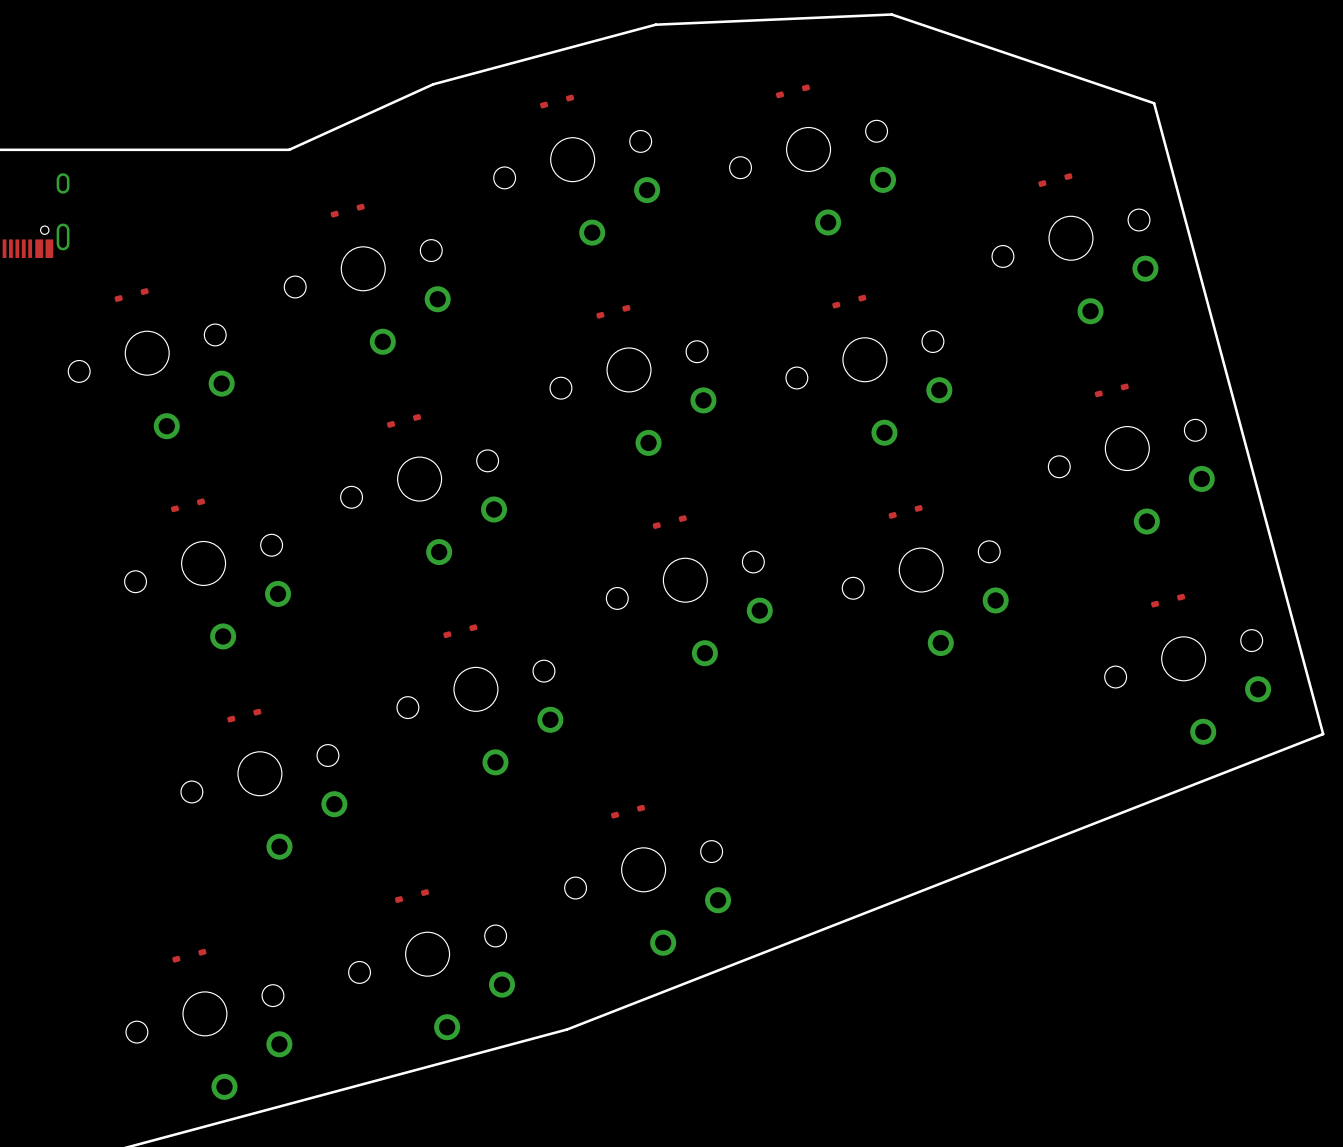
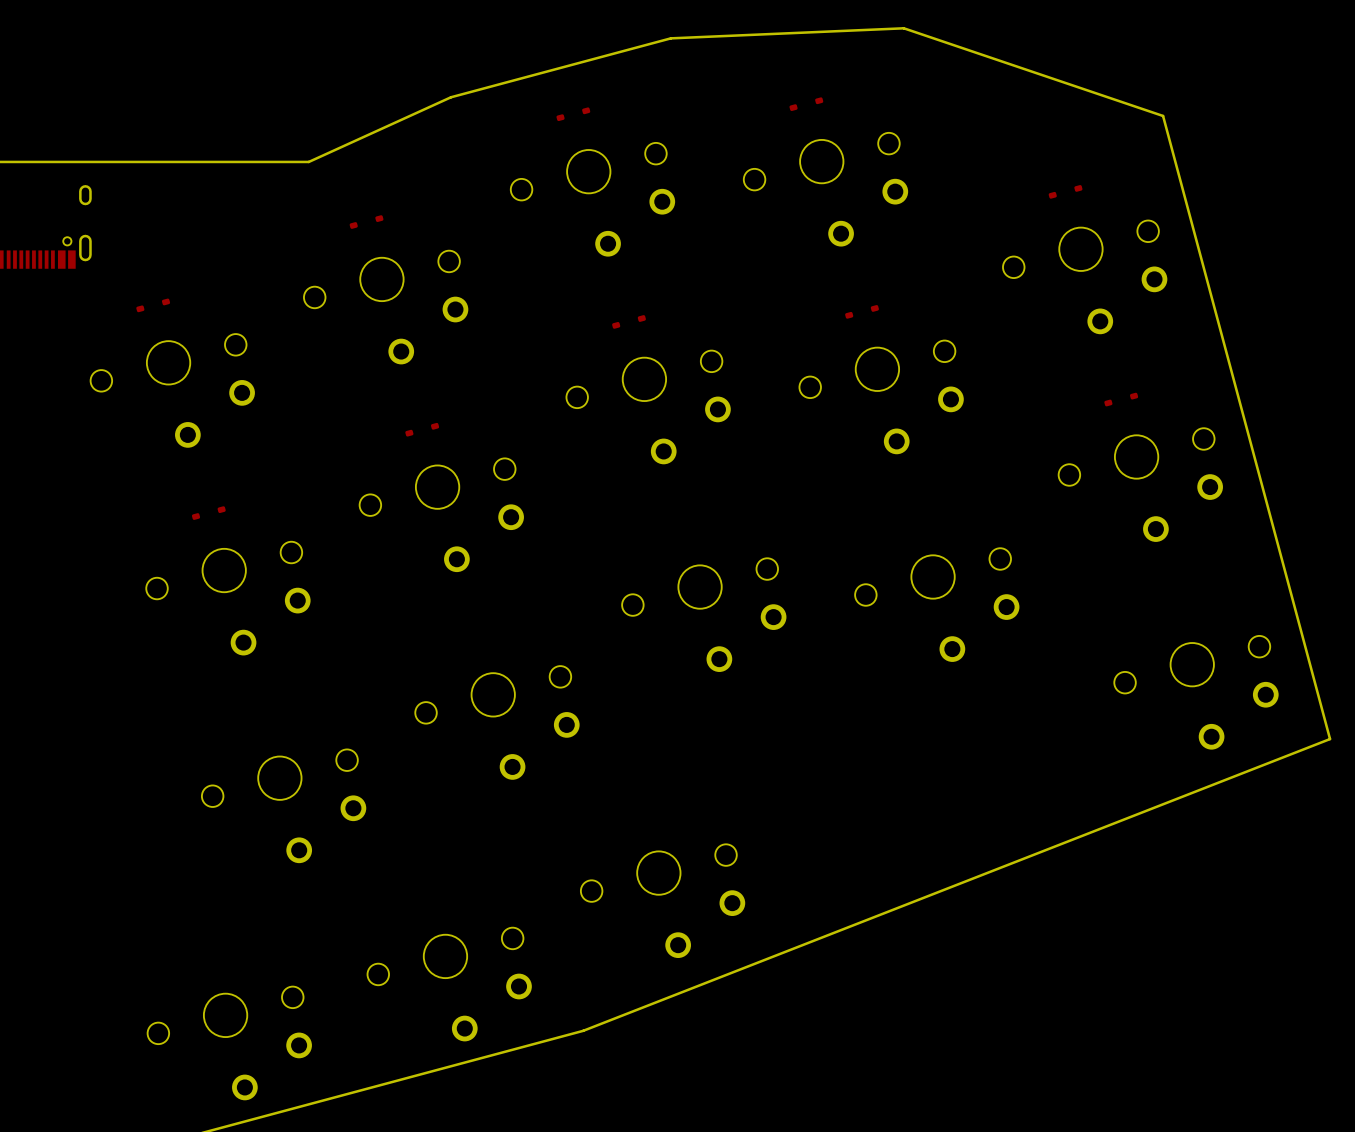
part: (905, 511) -> none
part: (669, 522) -> none
part: (1168, 600) -> none
part: (460, 631) -> none
part: (244, 715) -> none
part: (628, 811) -> none
part: (412, 896) -> none
part: (189, 955) -> none

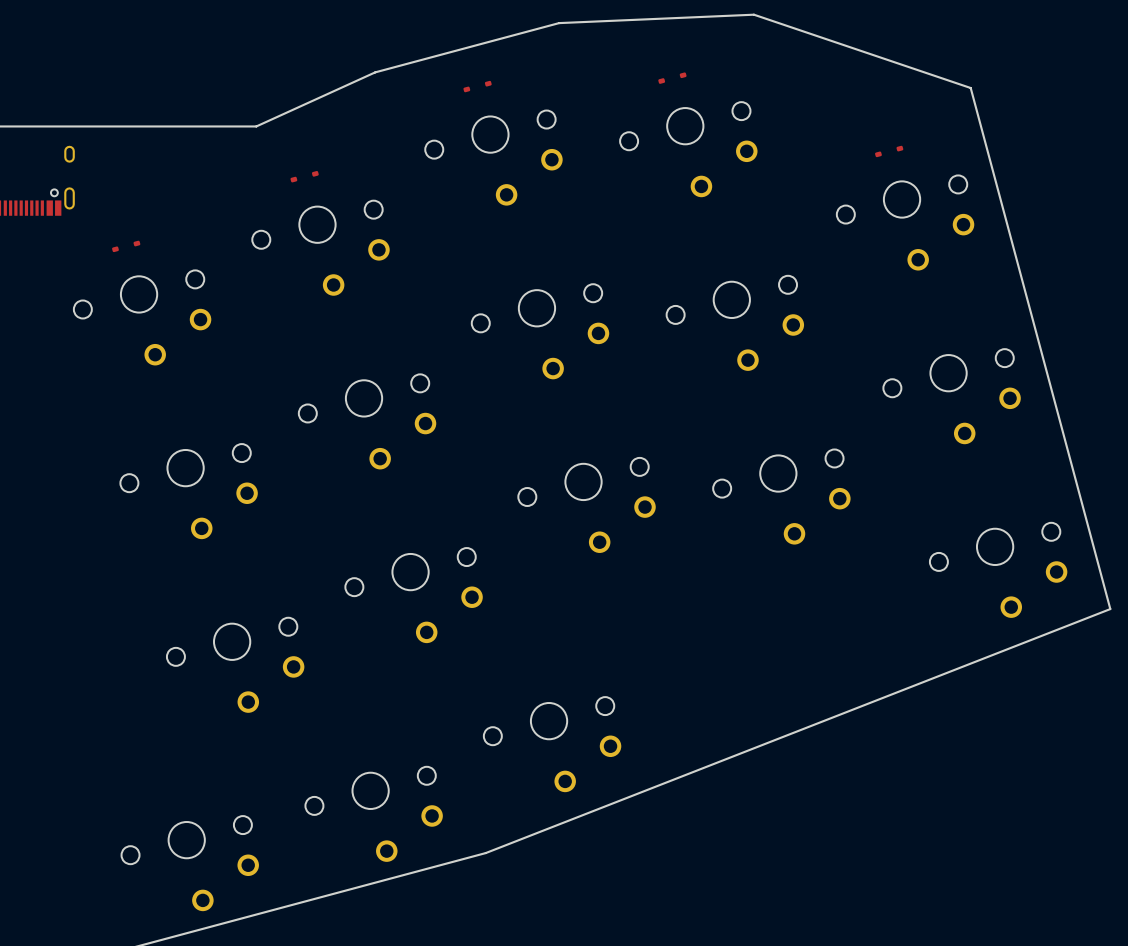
part: (862, 311) -> none
part: (629, 321) -> none
part: (1121, 399) -> none
part: (422, 429) -> none
part: (208, 513) -> none

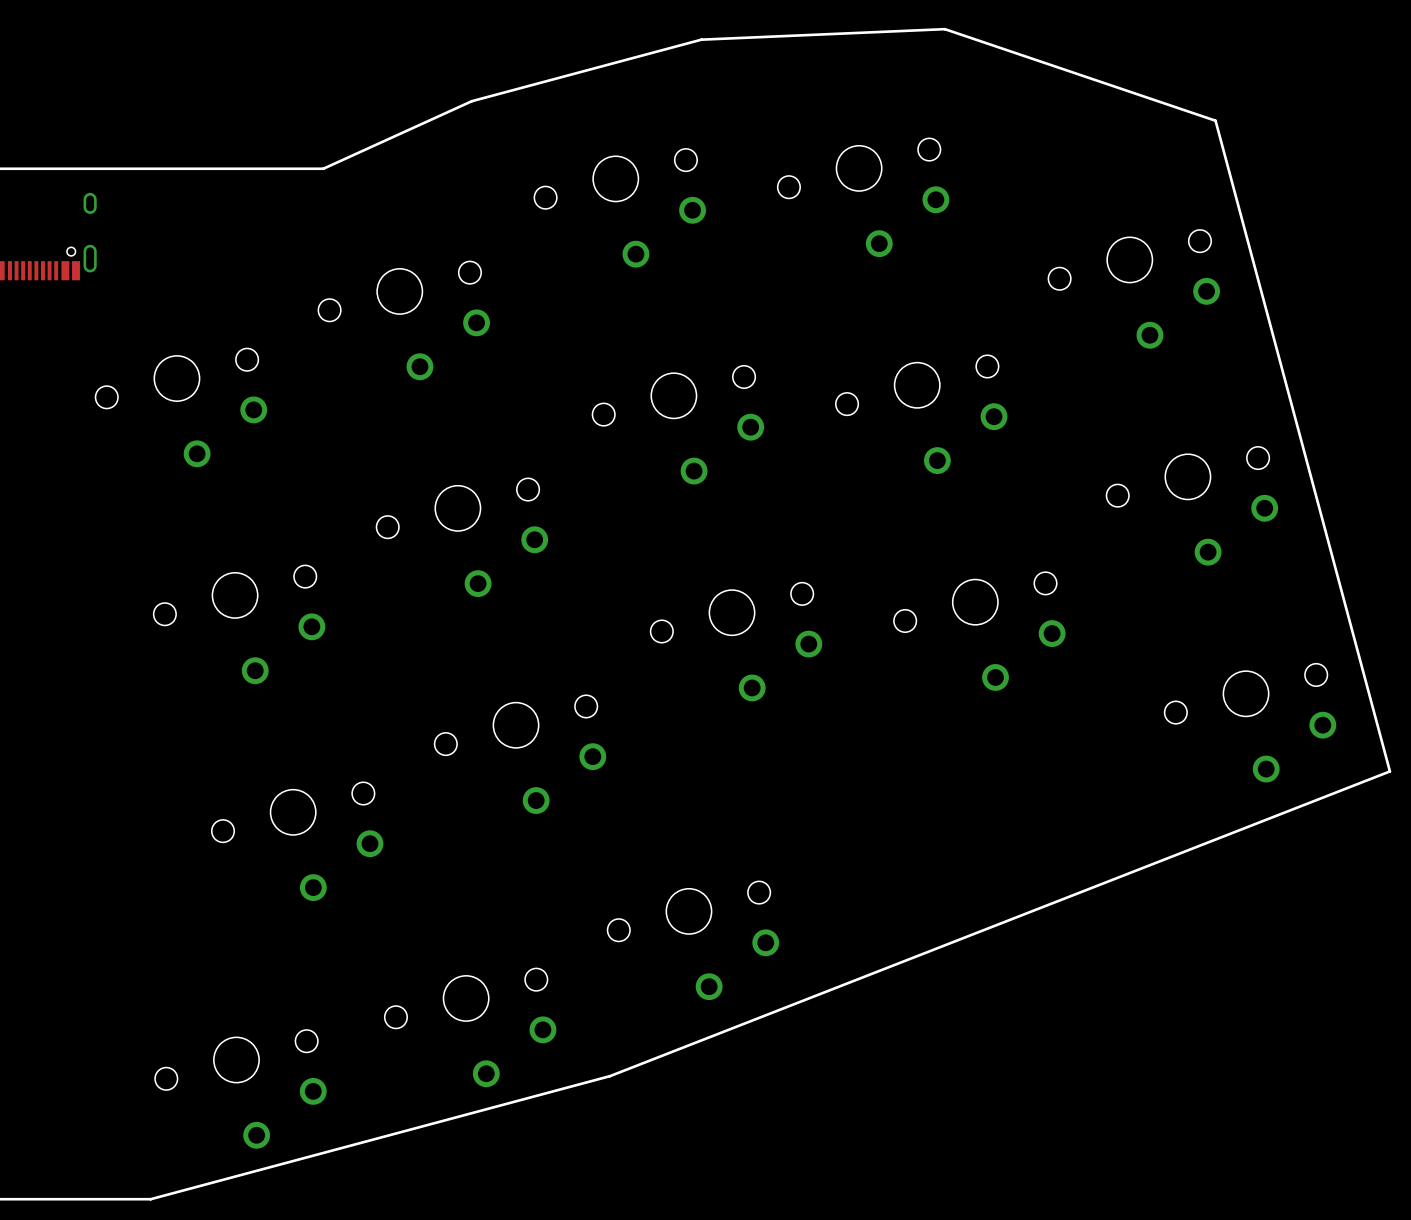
part: (672, 78) -> none
part: (477, 86) -> none
part: (889, 151) -> none
part: (304, 176) -> none
part: (126, 246) -> none

